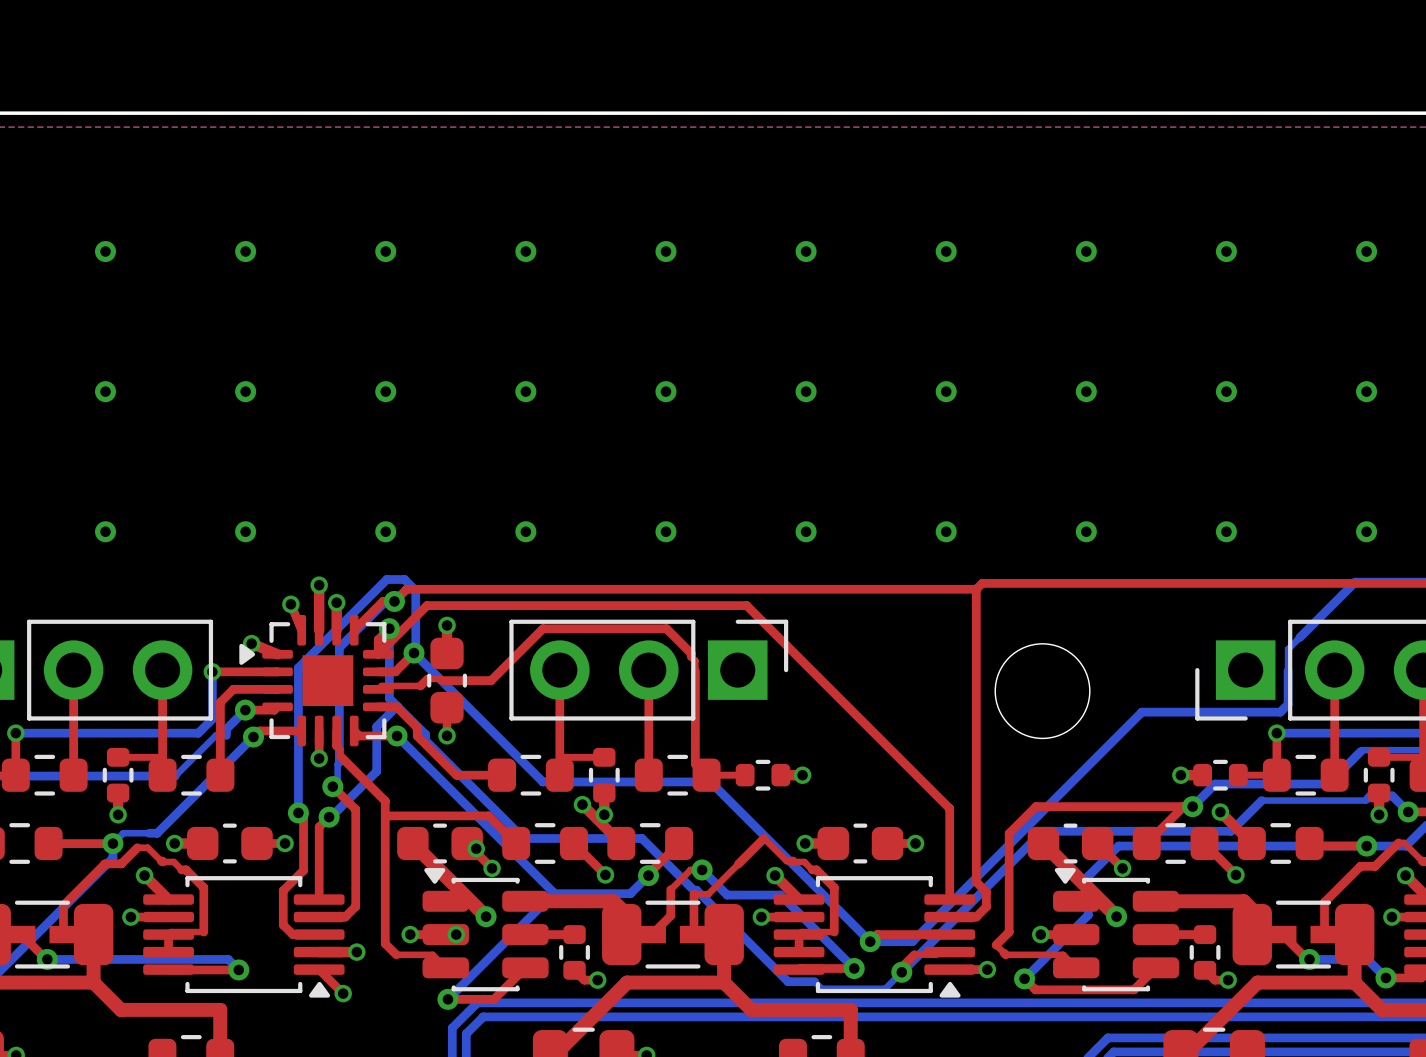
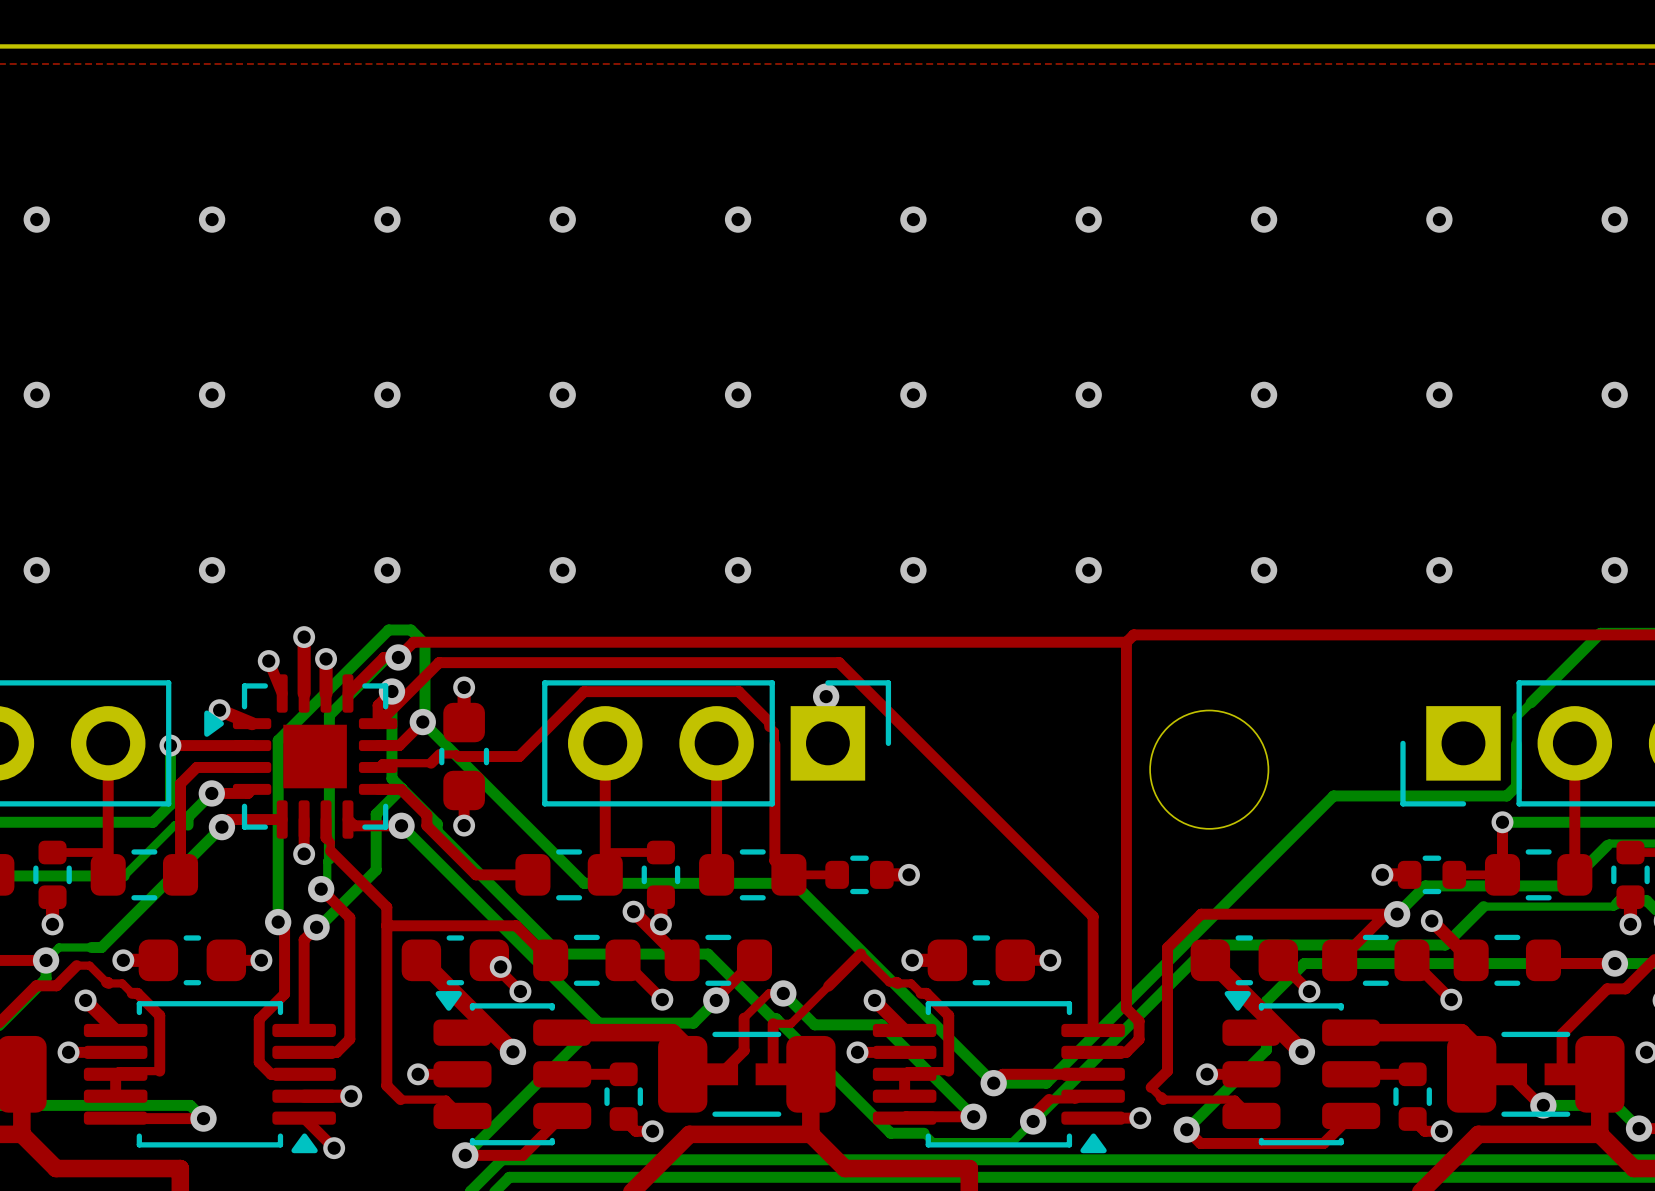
via: none -> (826, 696)
via: (456, 934) -> none

